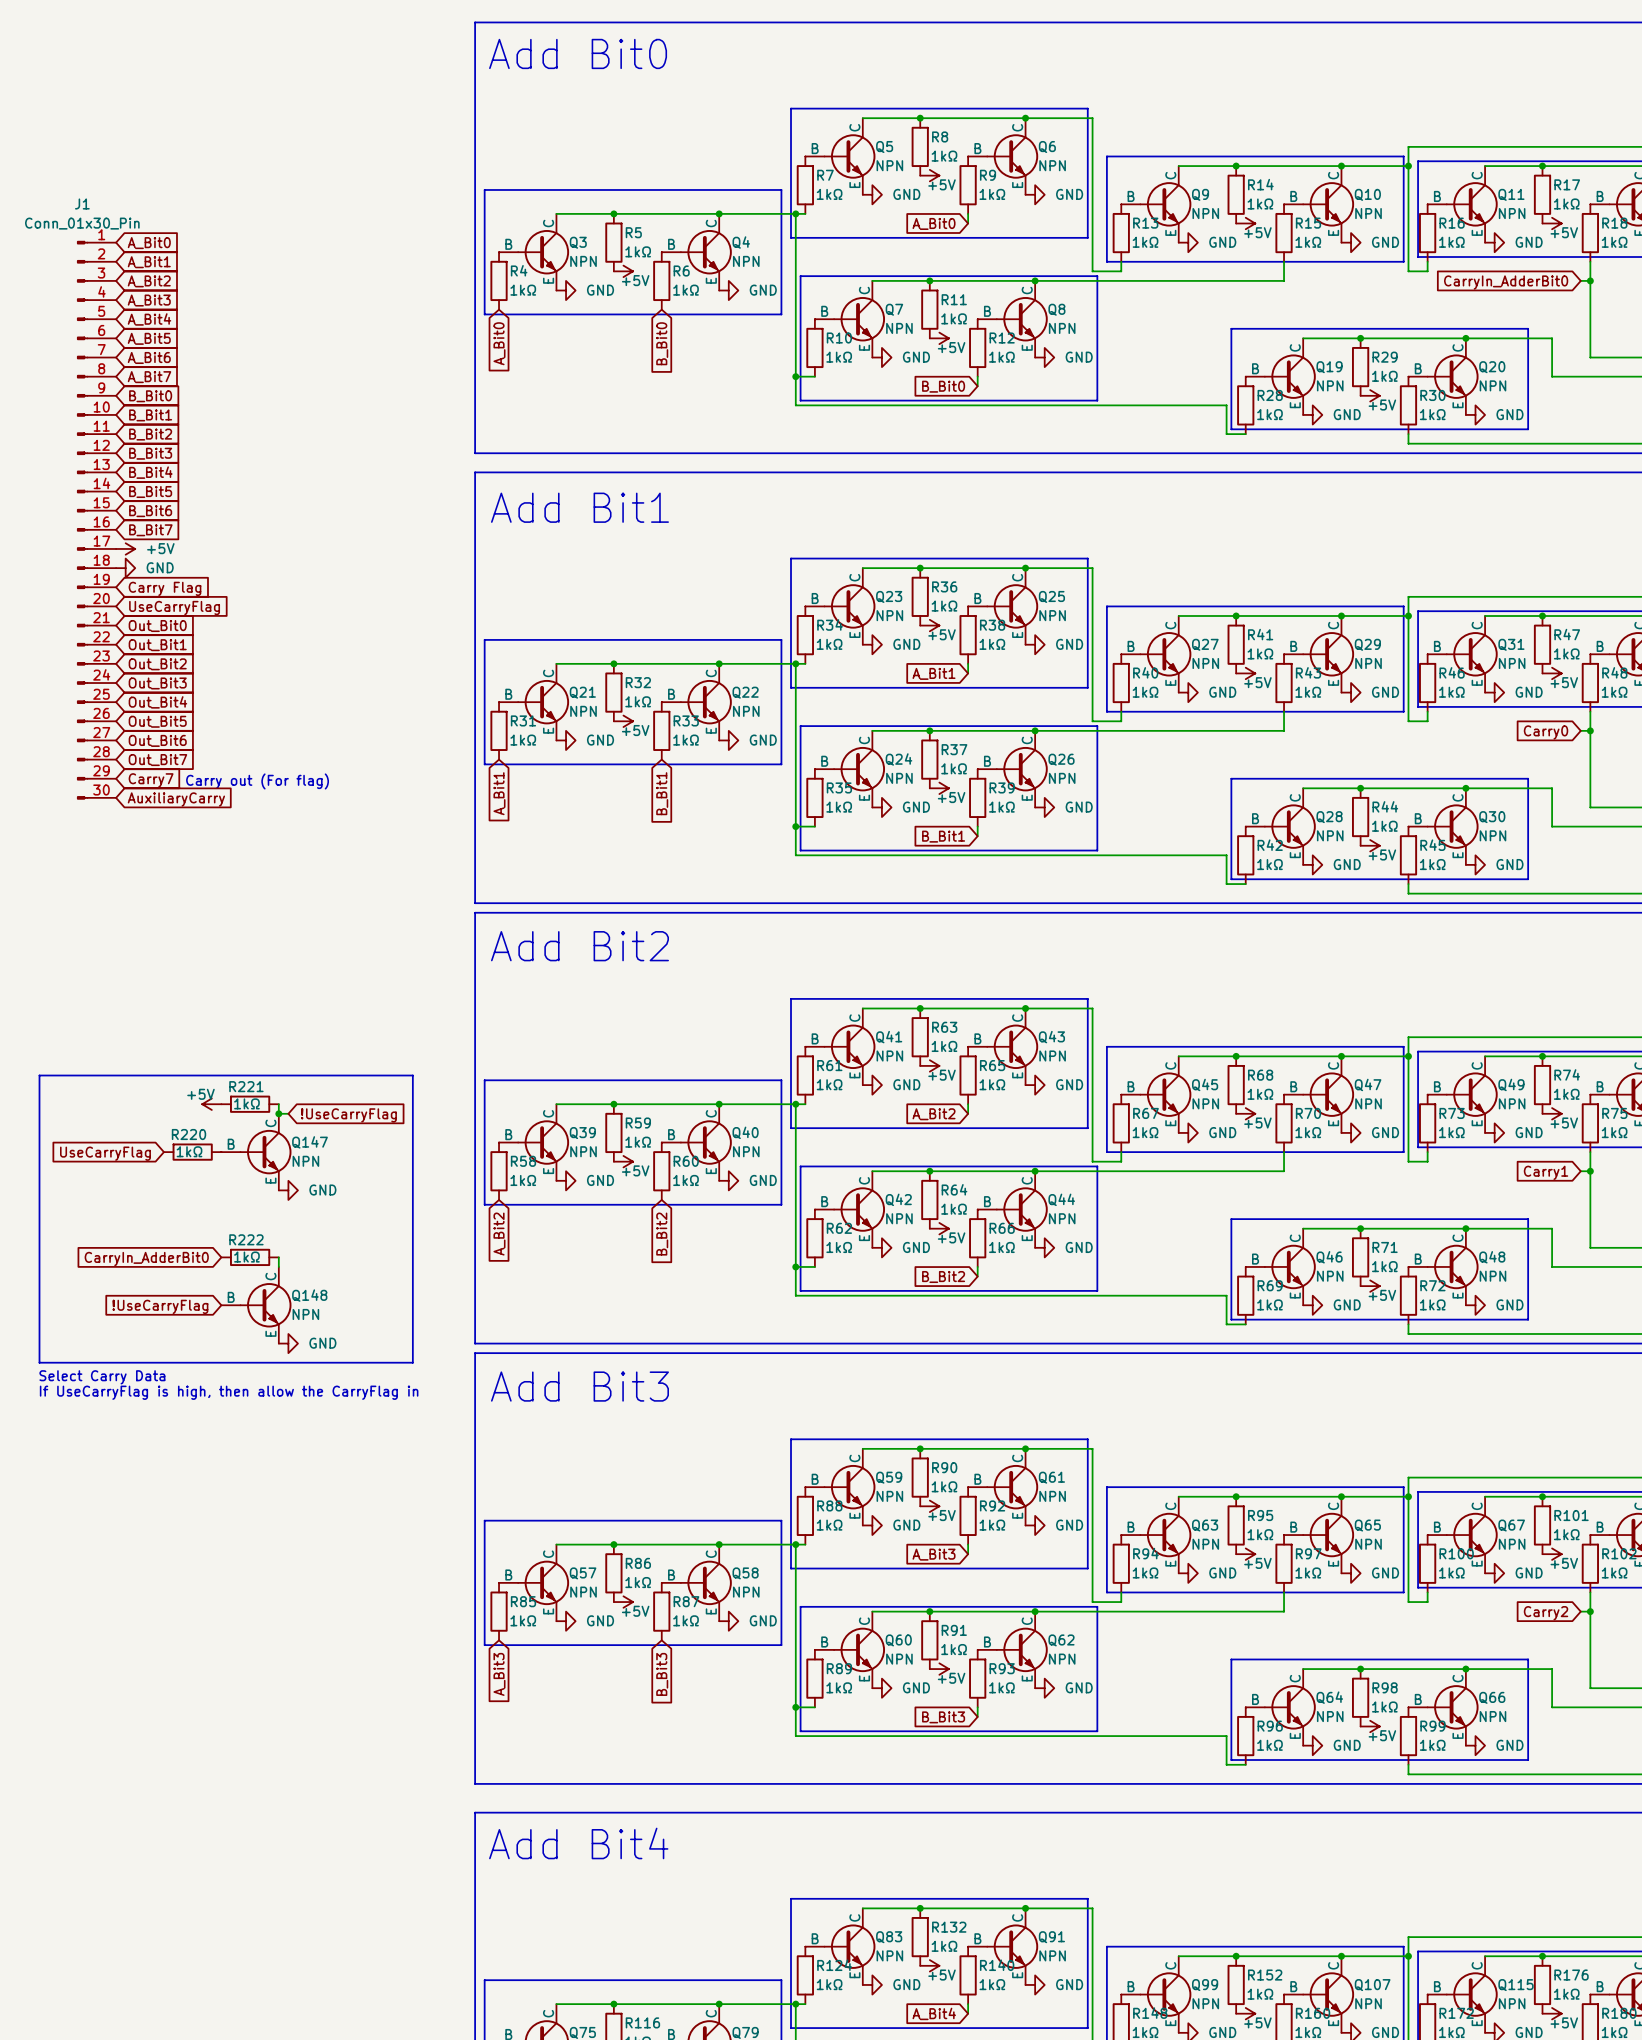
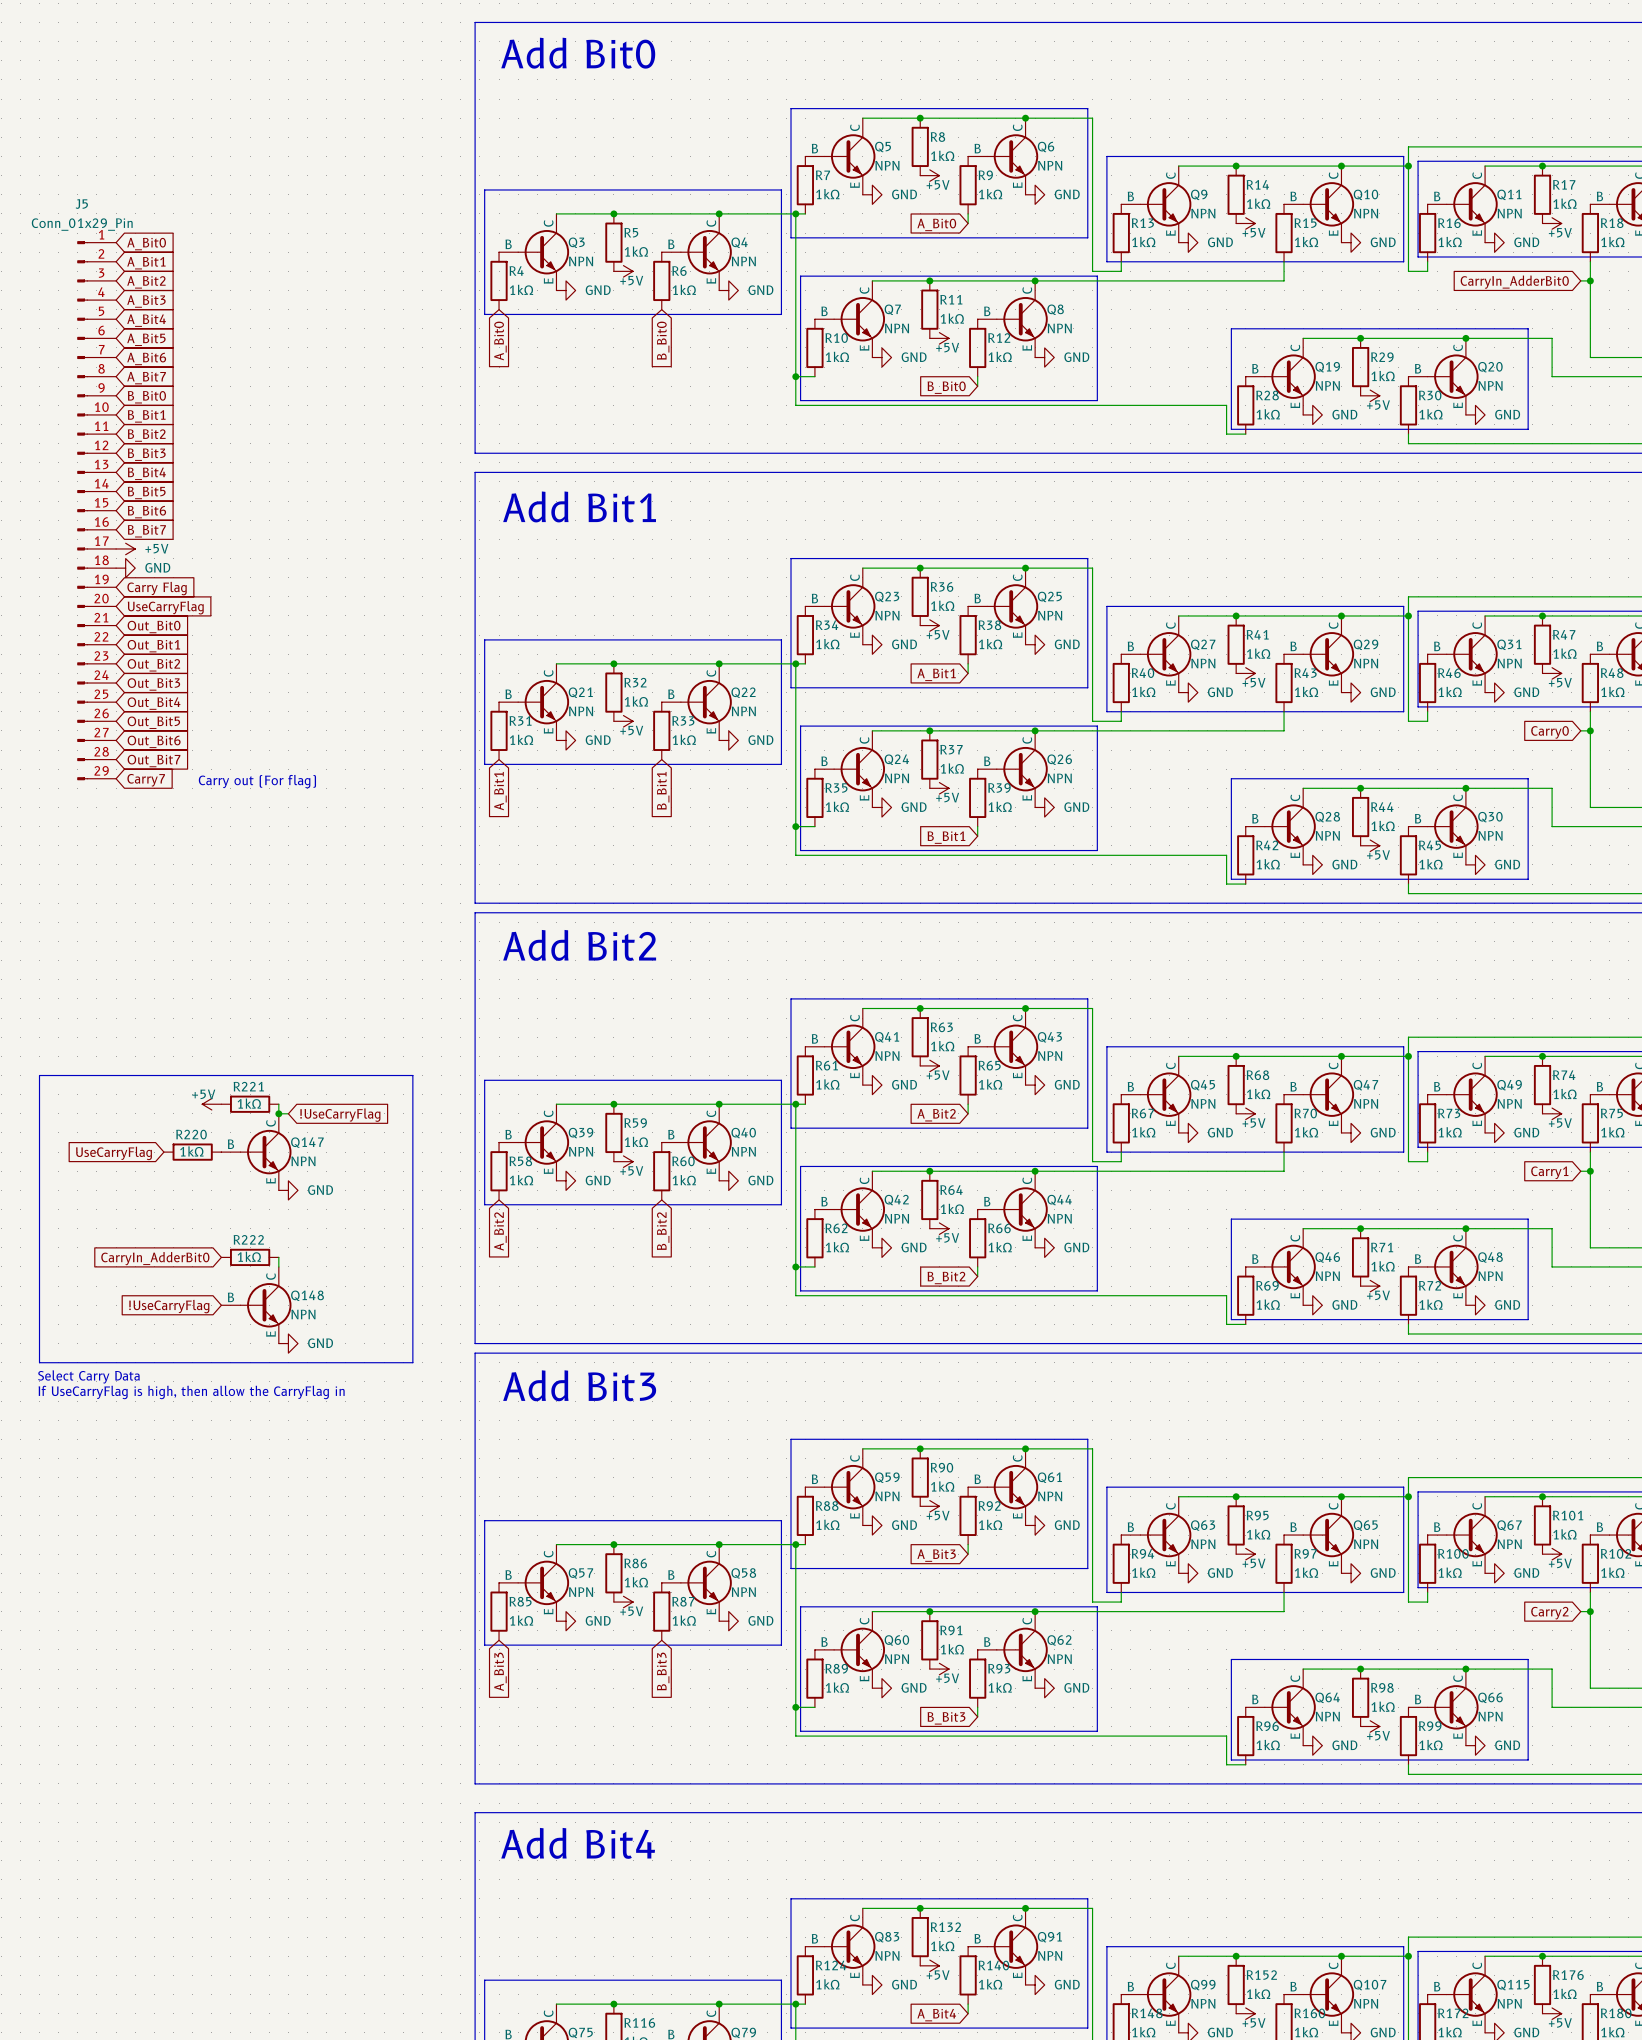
J5: none -> Conn_01x29_Pin (96, 510)
J1: Conn_01x30_Pin (96, 520) -> none
global label: AuxiliaryCarry (176, 799) -> none

